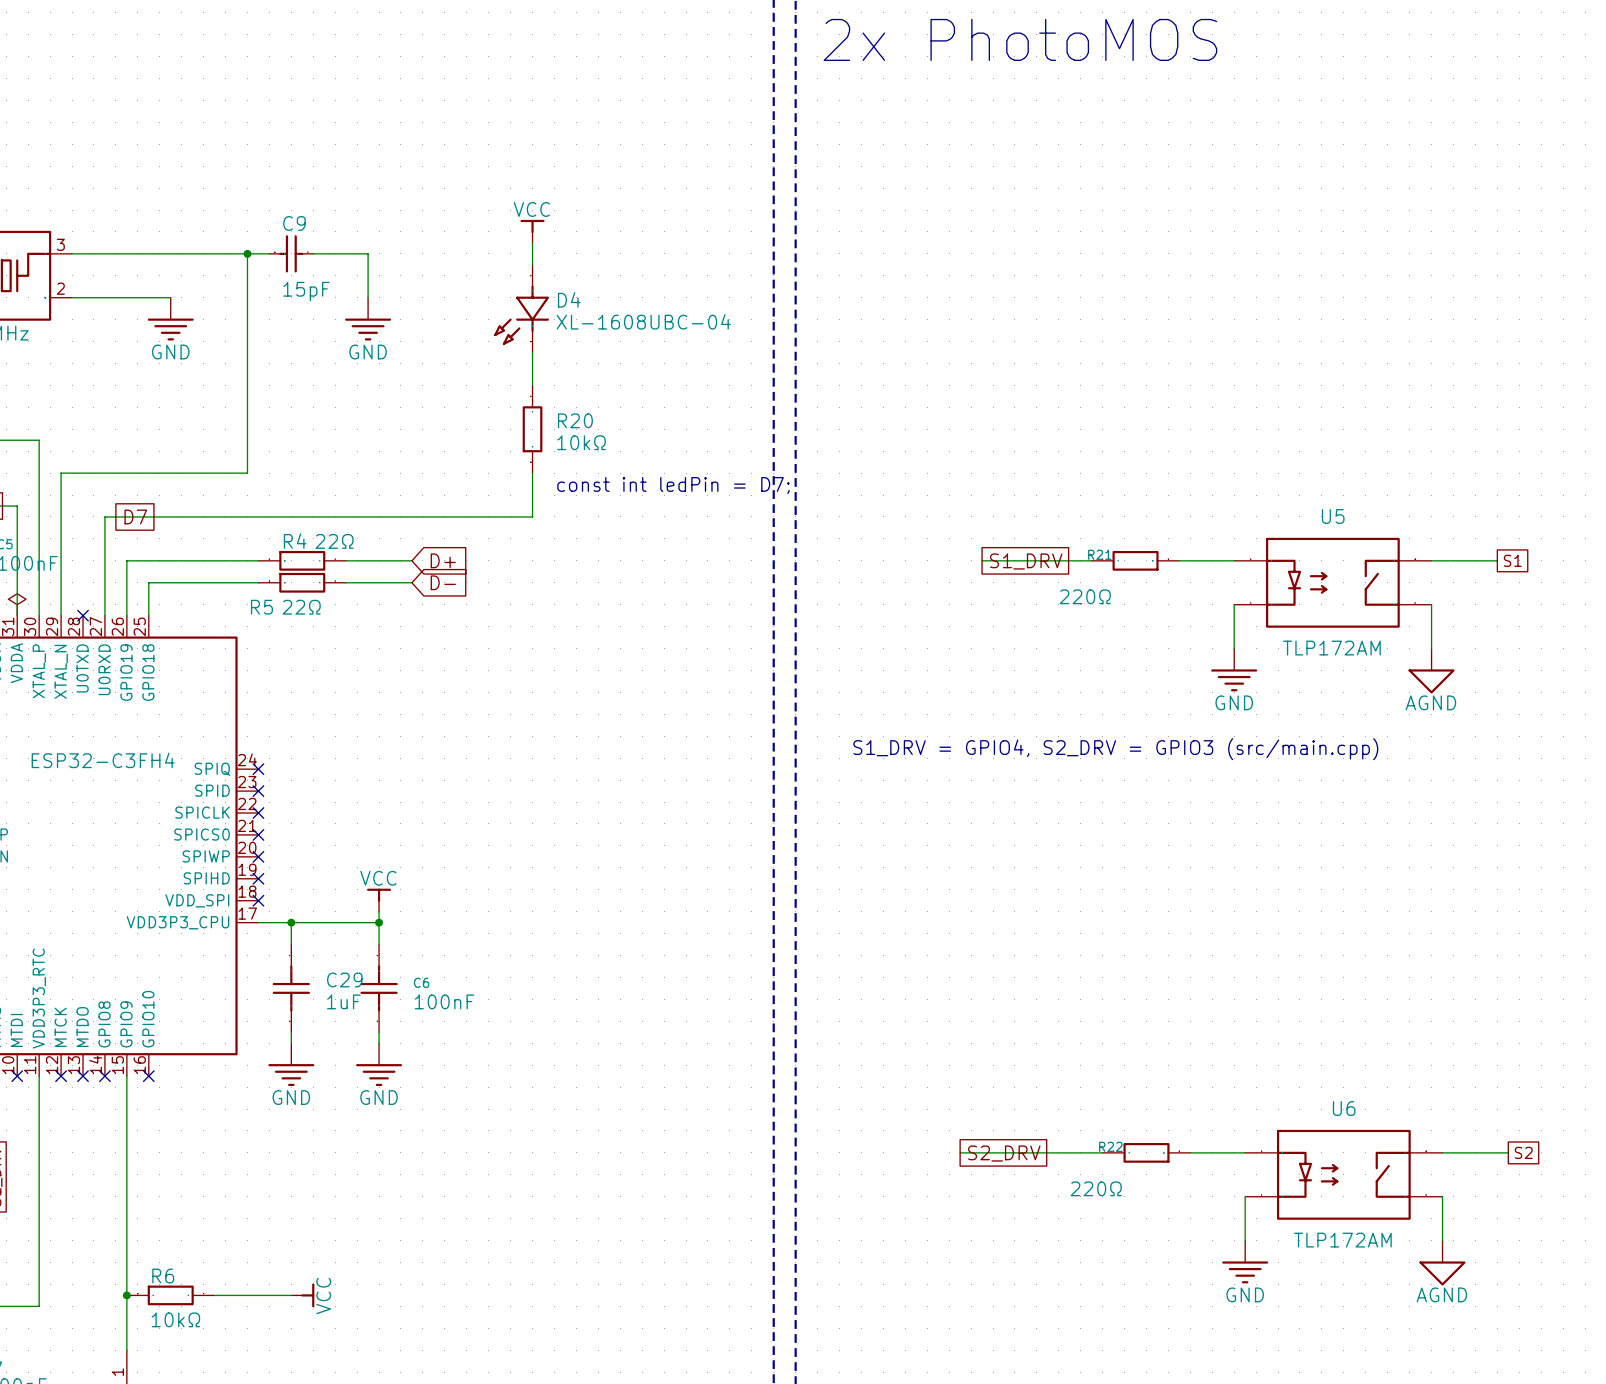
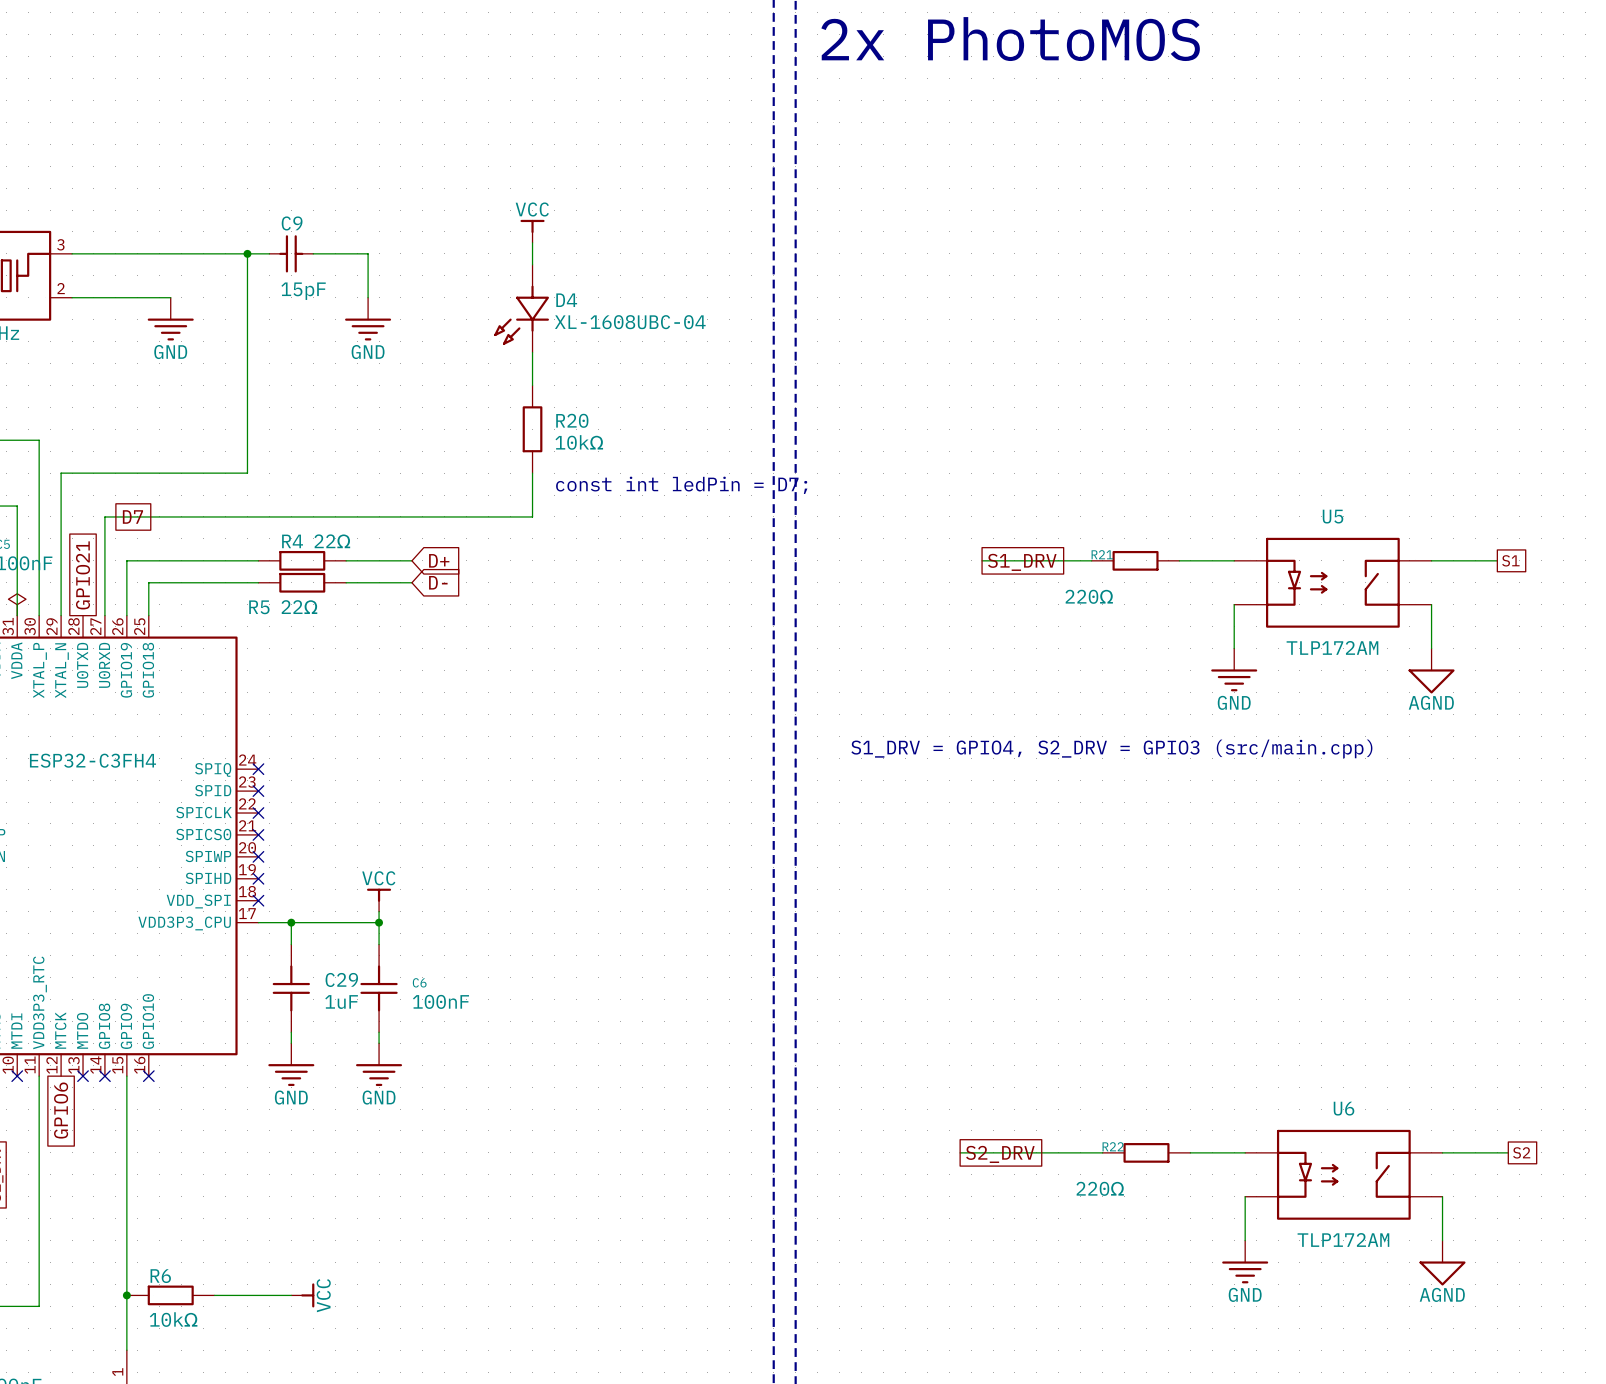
global label: none -> GPIO21 (83, 575)
no-connect mark: (83, 615) -> none
no-connect mark: (61, 1076) -> none
global label: none -> GPIO6 (61, 1110)

